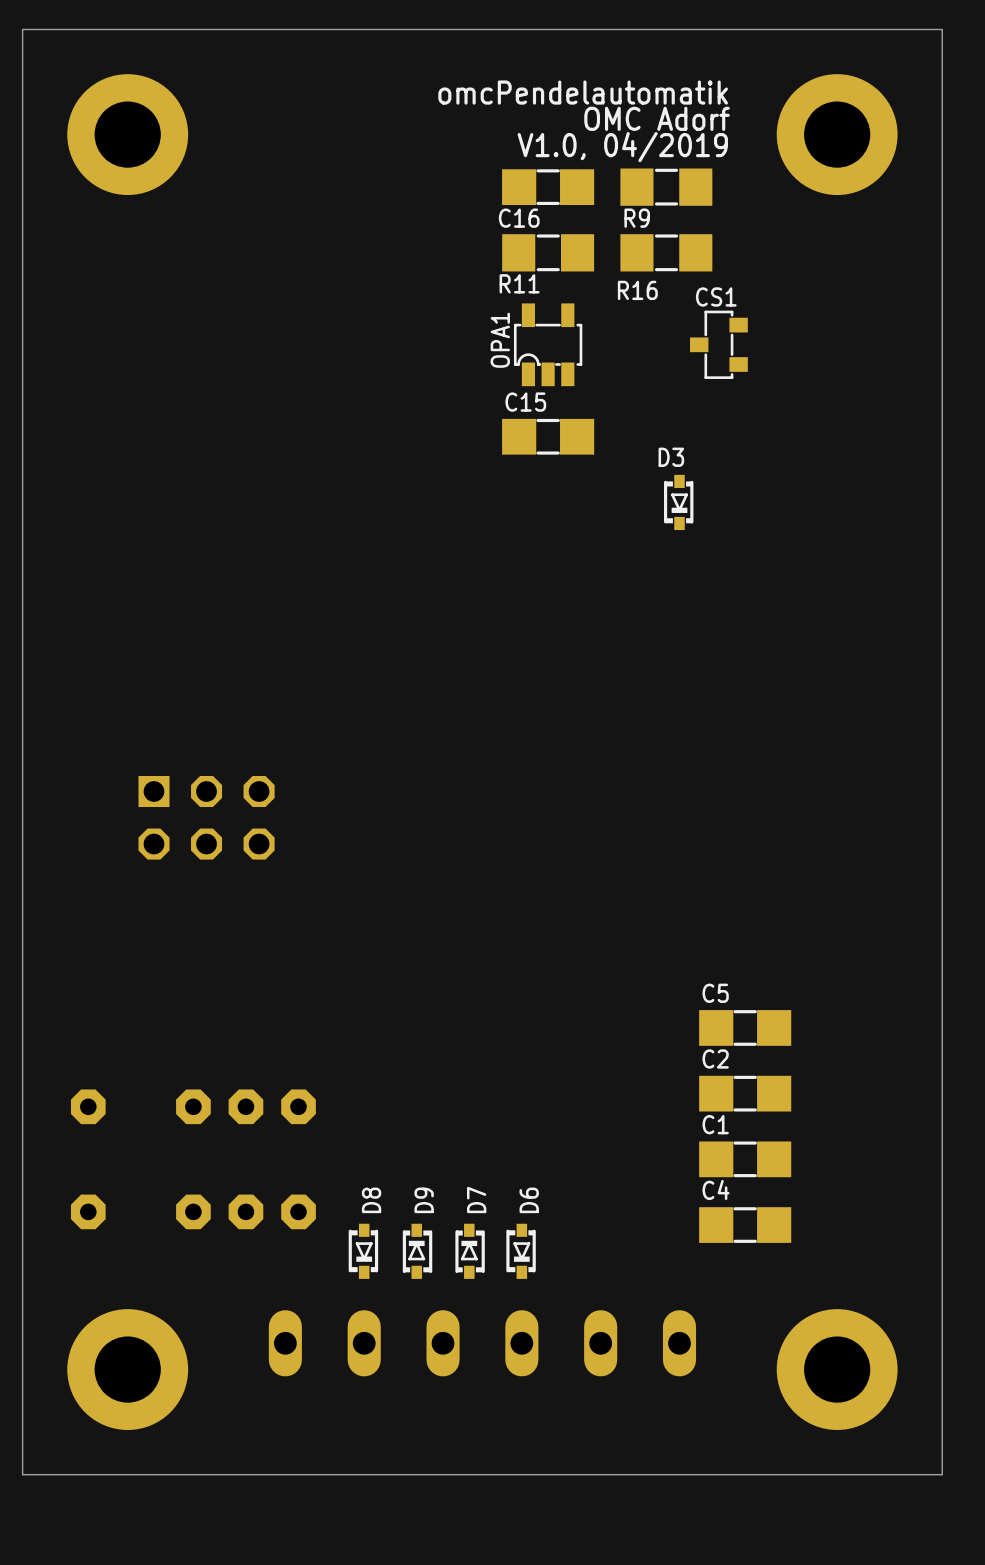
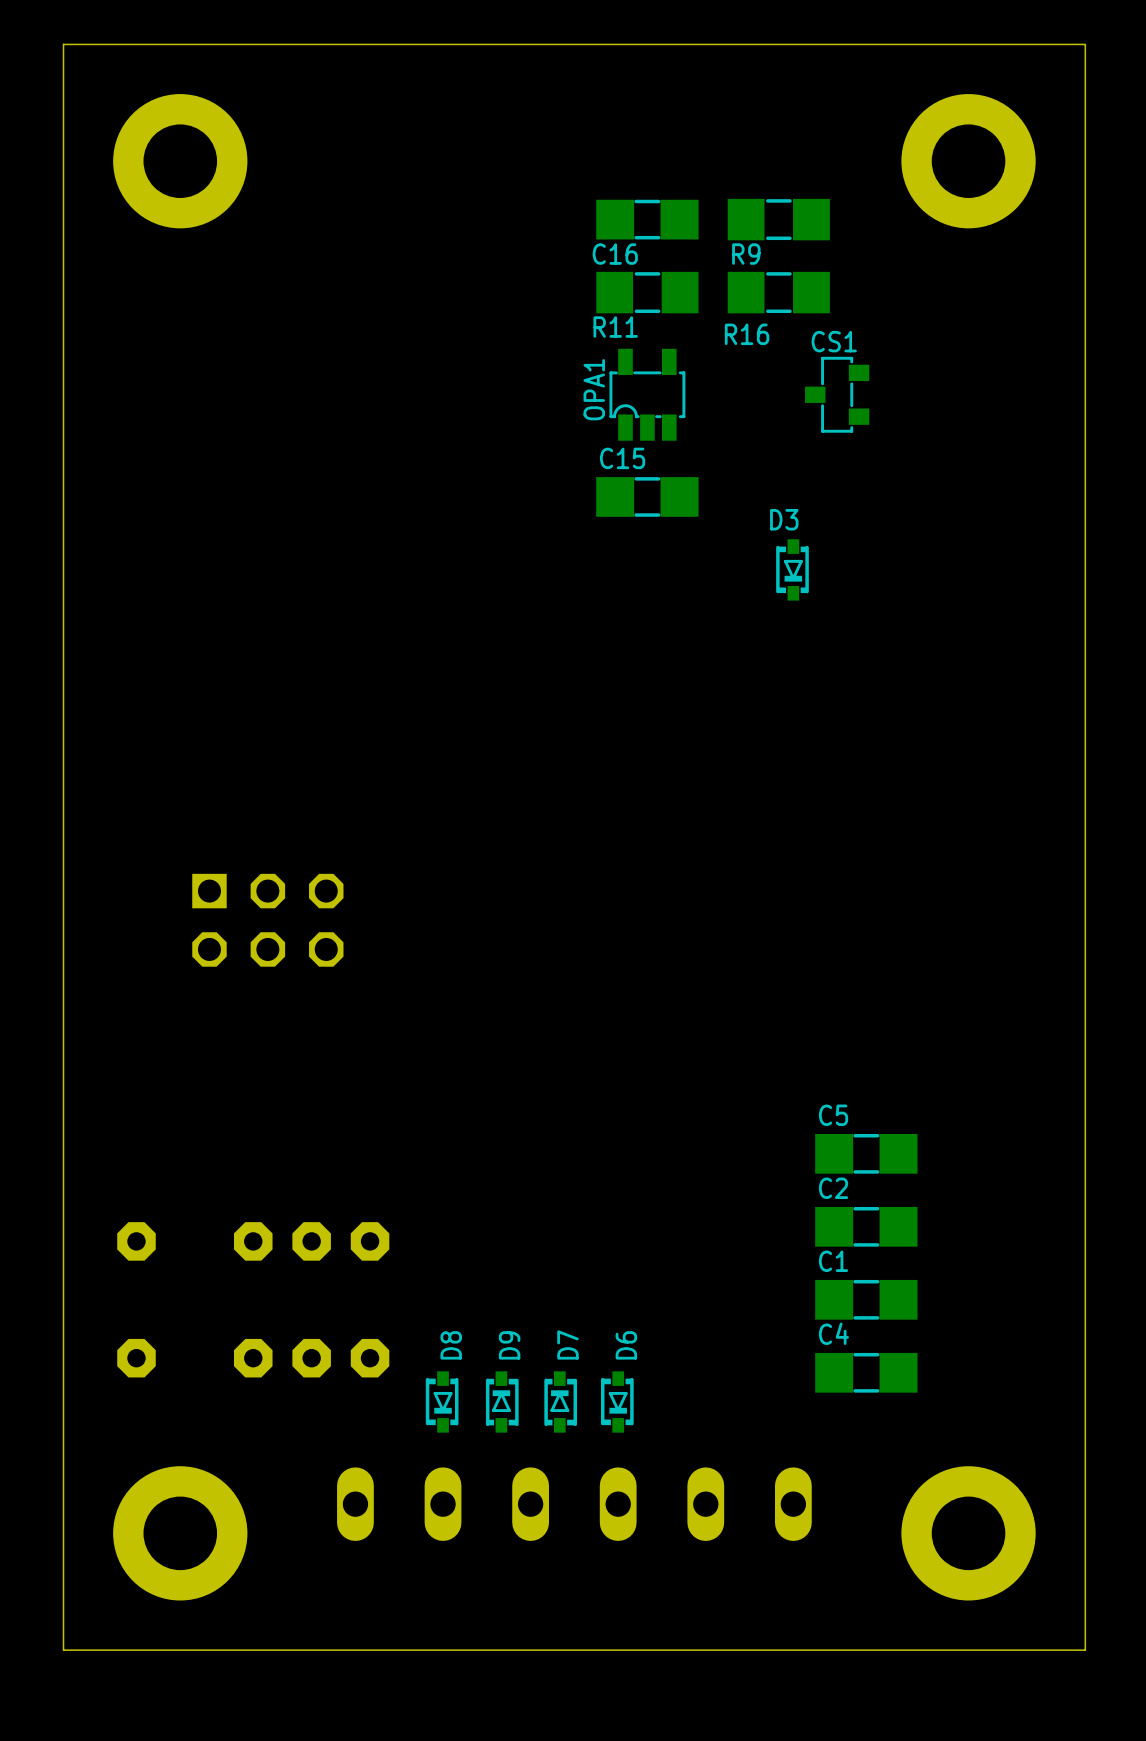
text: omcPendelautomatik (583, 92) -> none
text: OMC Adorf (657, 118) -> none
text: V1.0, 04/2019 (622, 147) -> none

